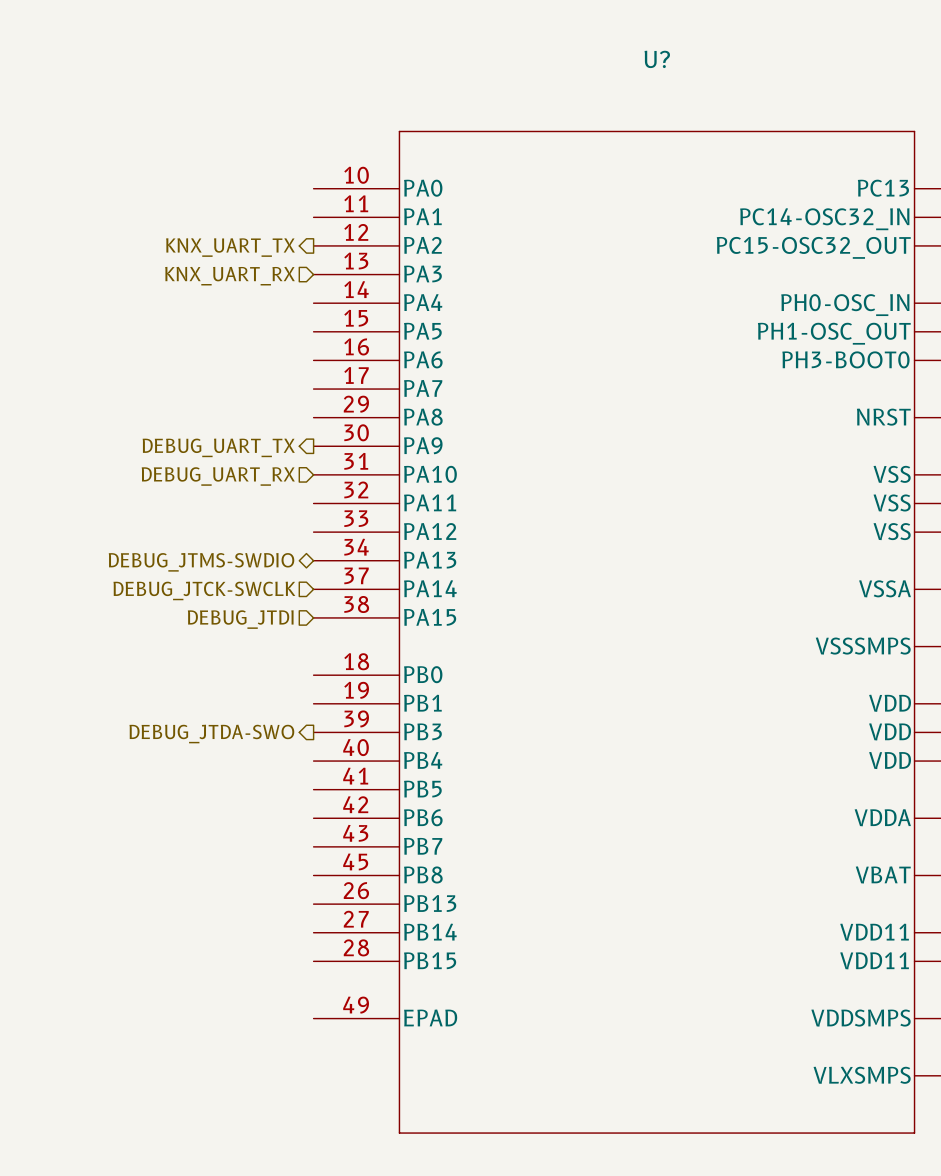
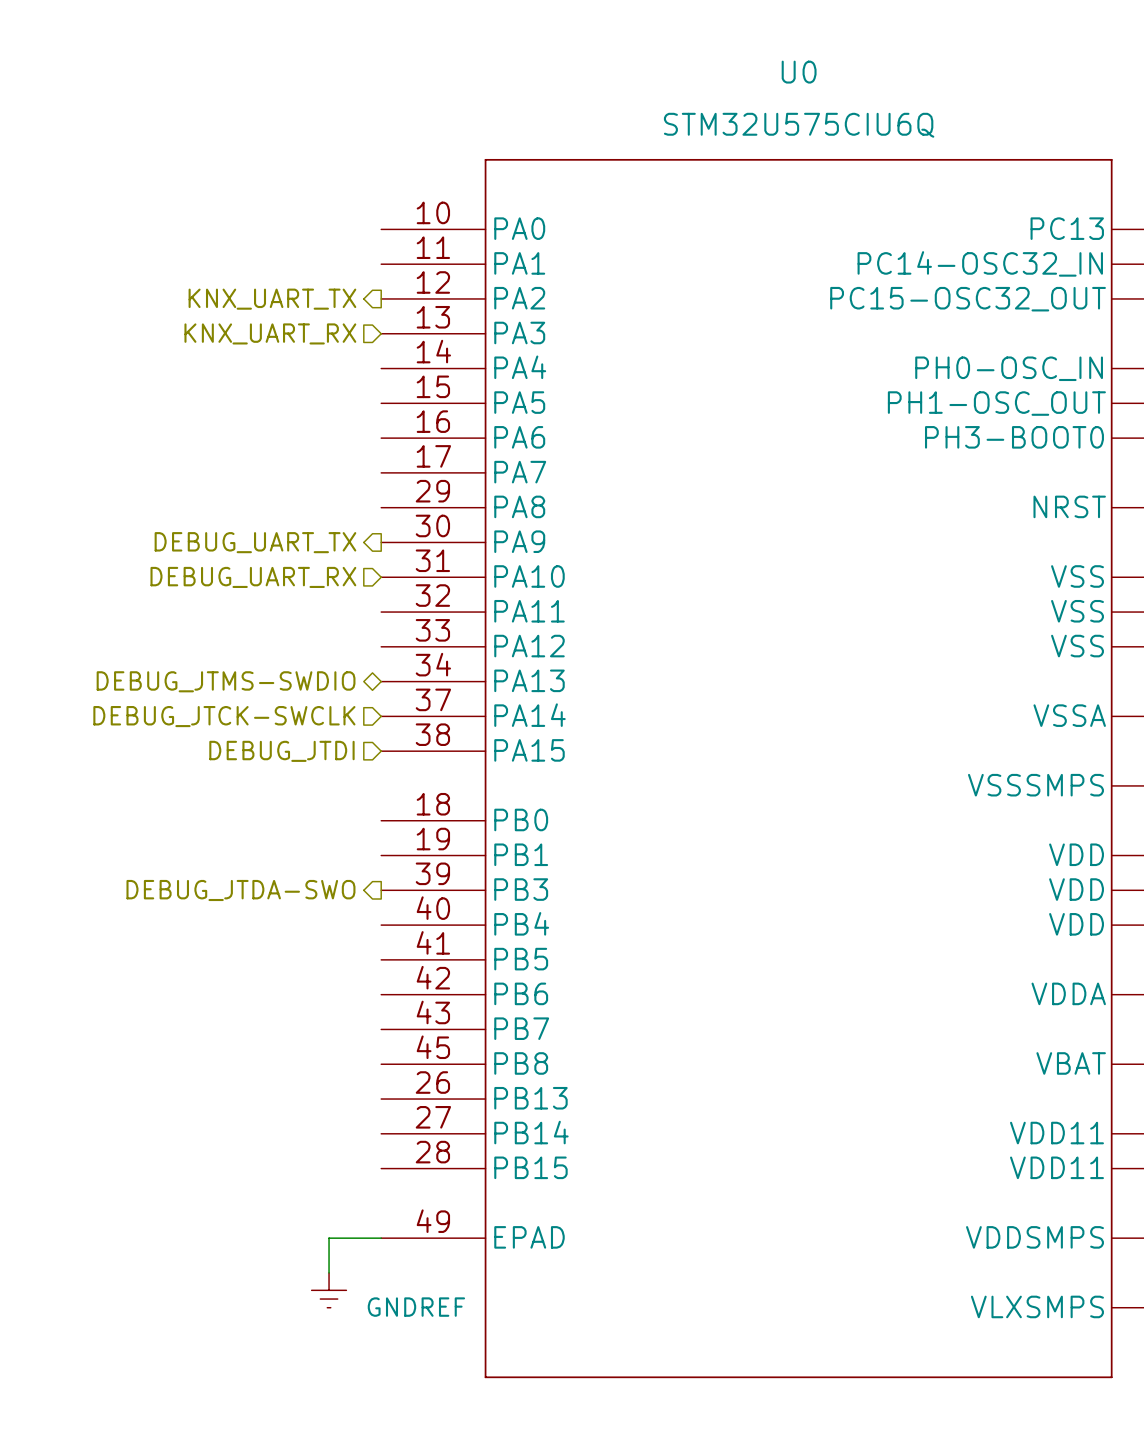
U? name: U? (657, 59) -> U0 (799, 72)
U? value: none -> STM32U575CIU6Q (799, 125)
wire: none -> (381, 1238) (329, 1238) (329, 1272)
power symbol: none -> GNDREF (329, 1290)

